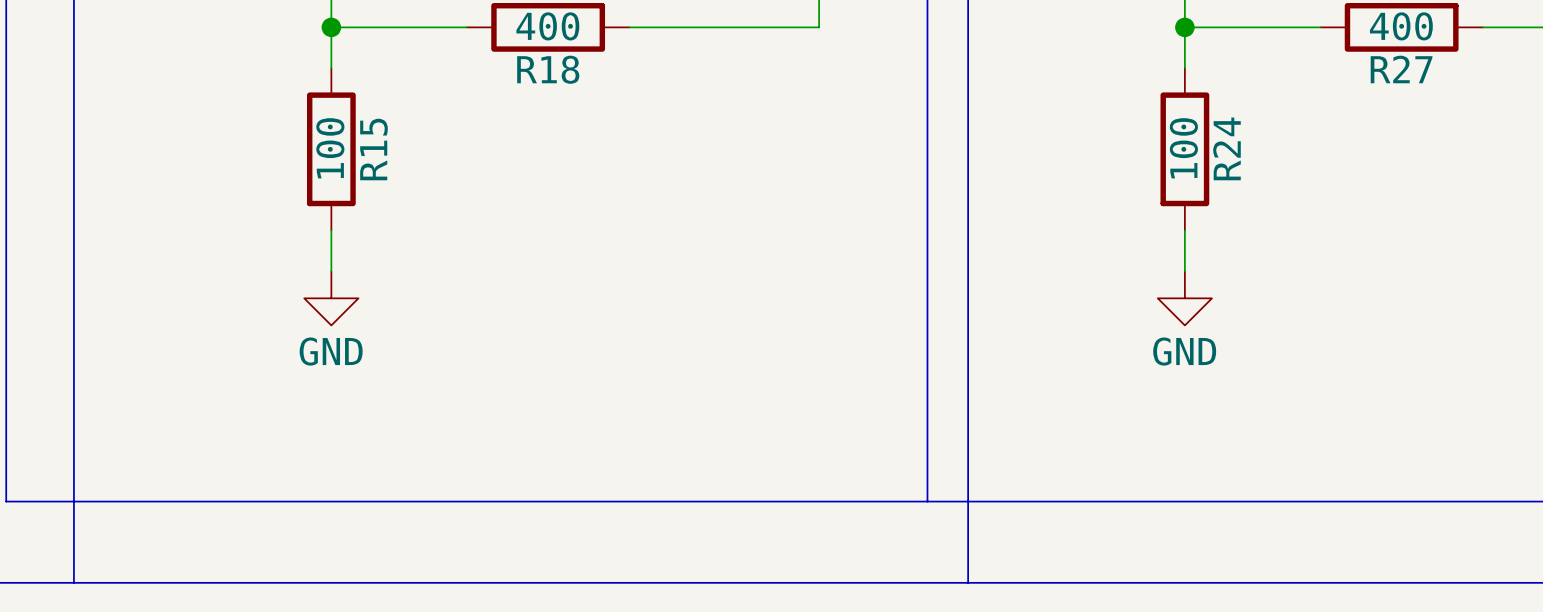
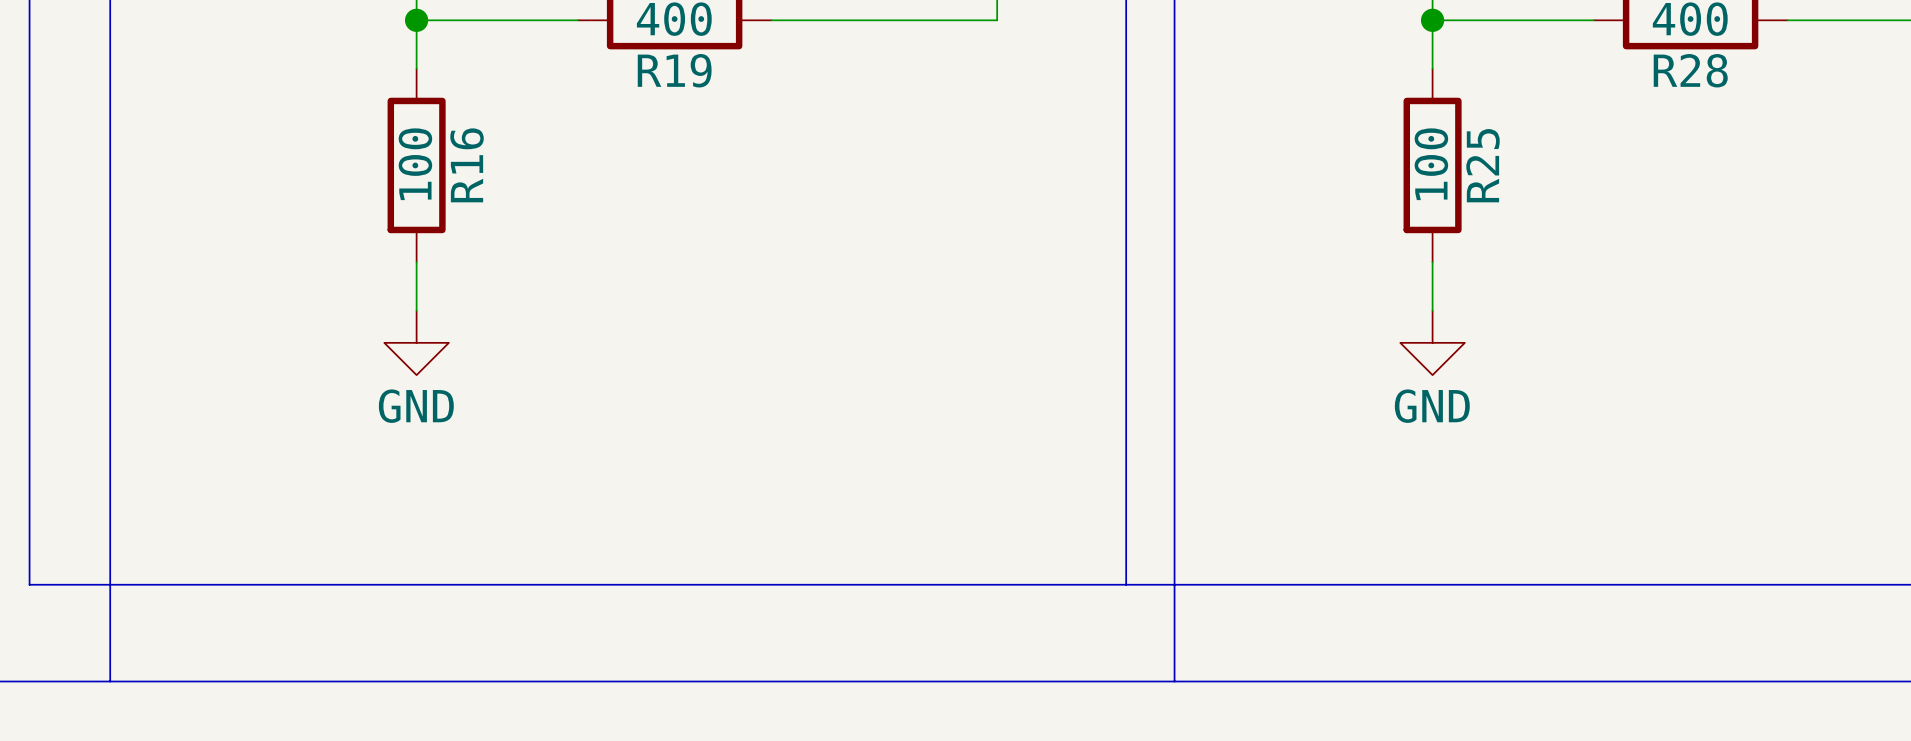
R18 name: R18 (548, 69) -> R19 (674, 70)
R27 name: R27 (1401, 69) -> R28 (1690, 70)
R24 name: R24 (1226, 148) -> R25 (1483, 165)
R15 name: R15 (373, 149) -> R16 (467, 165)

